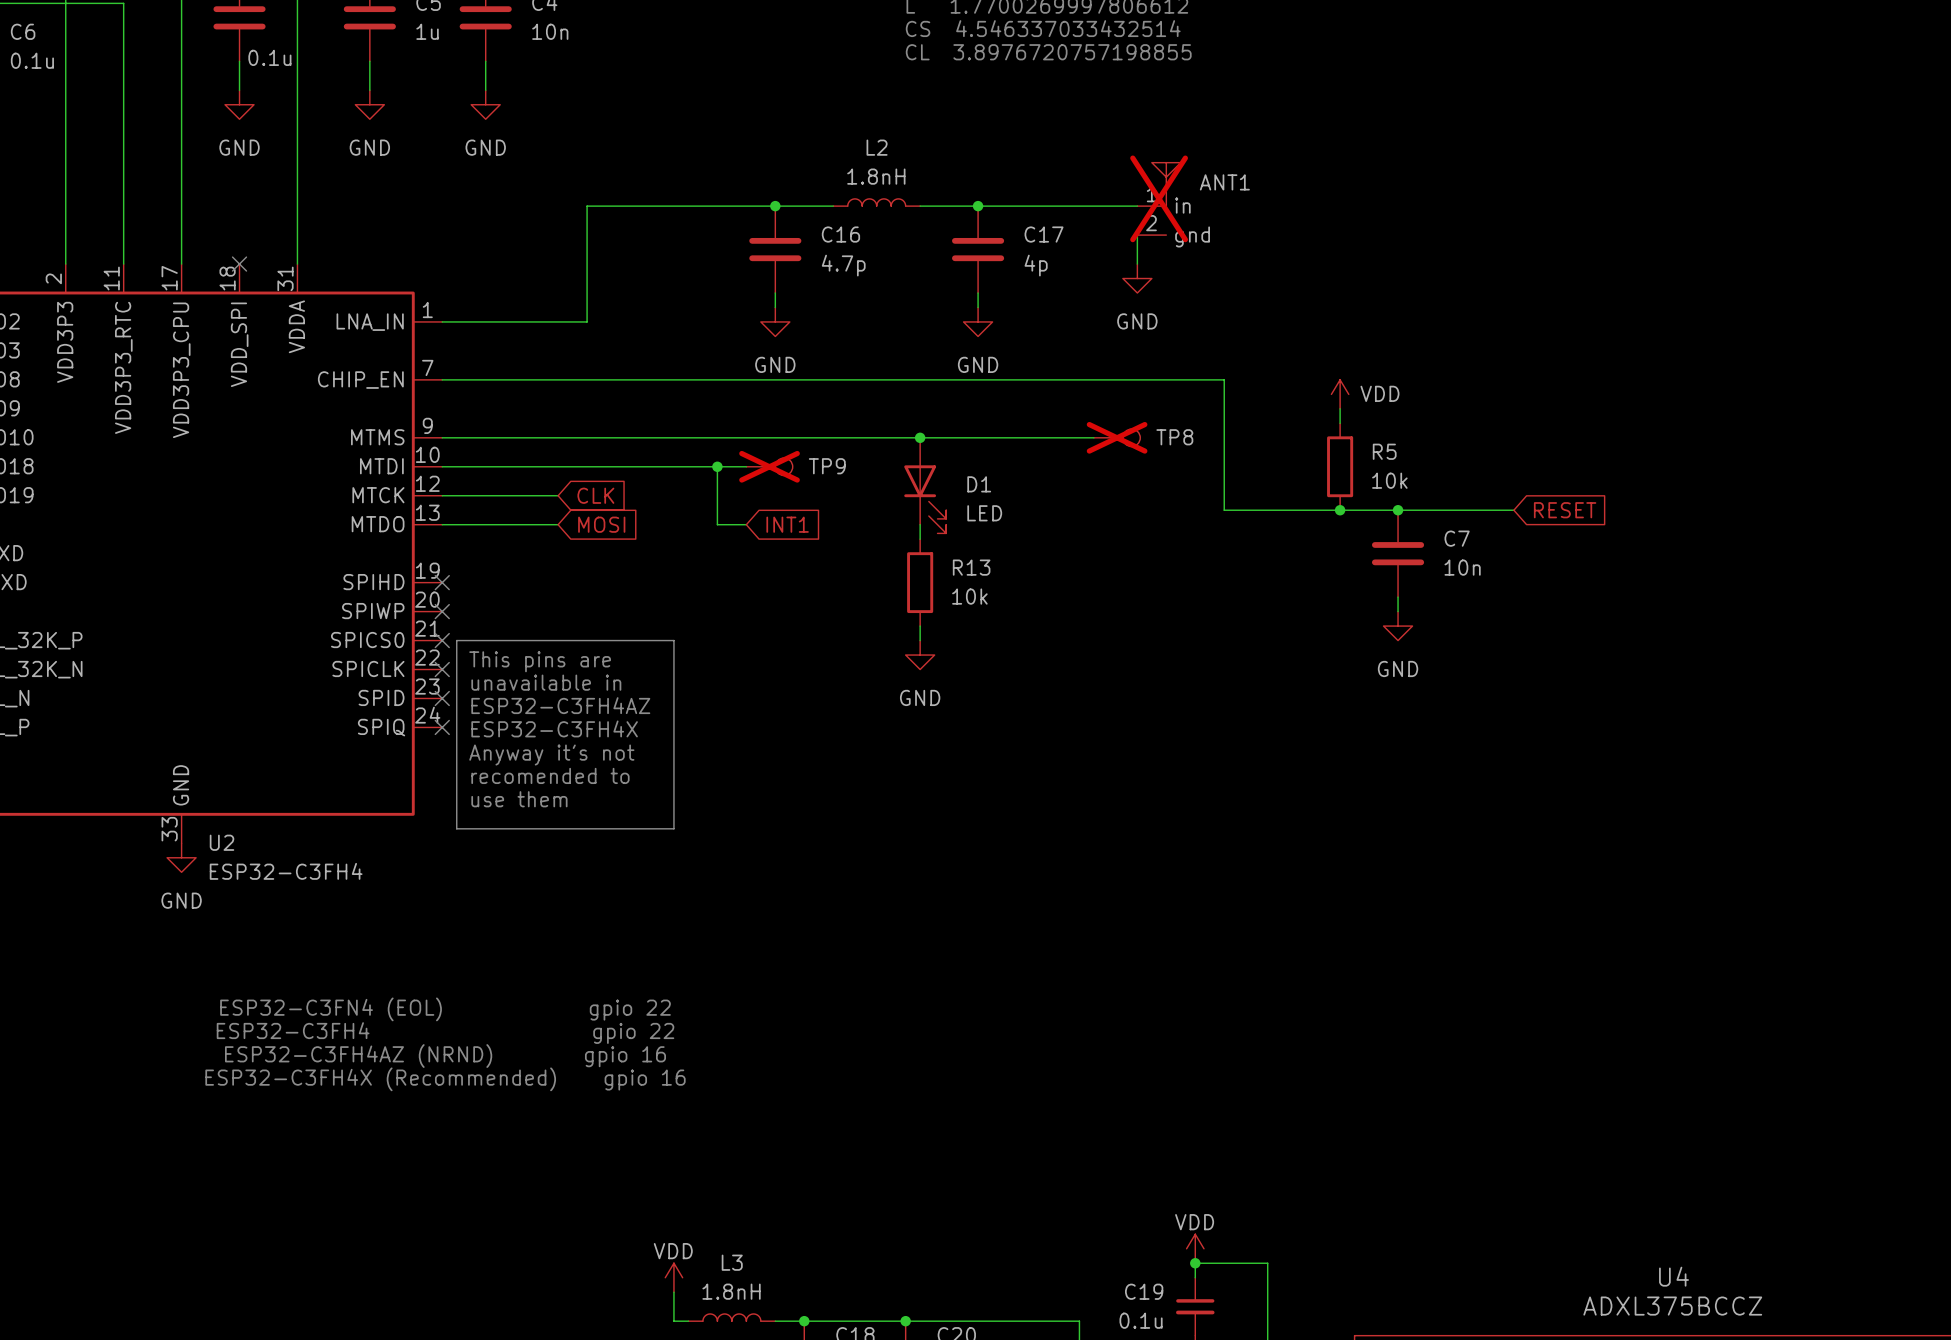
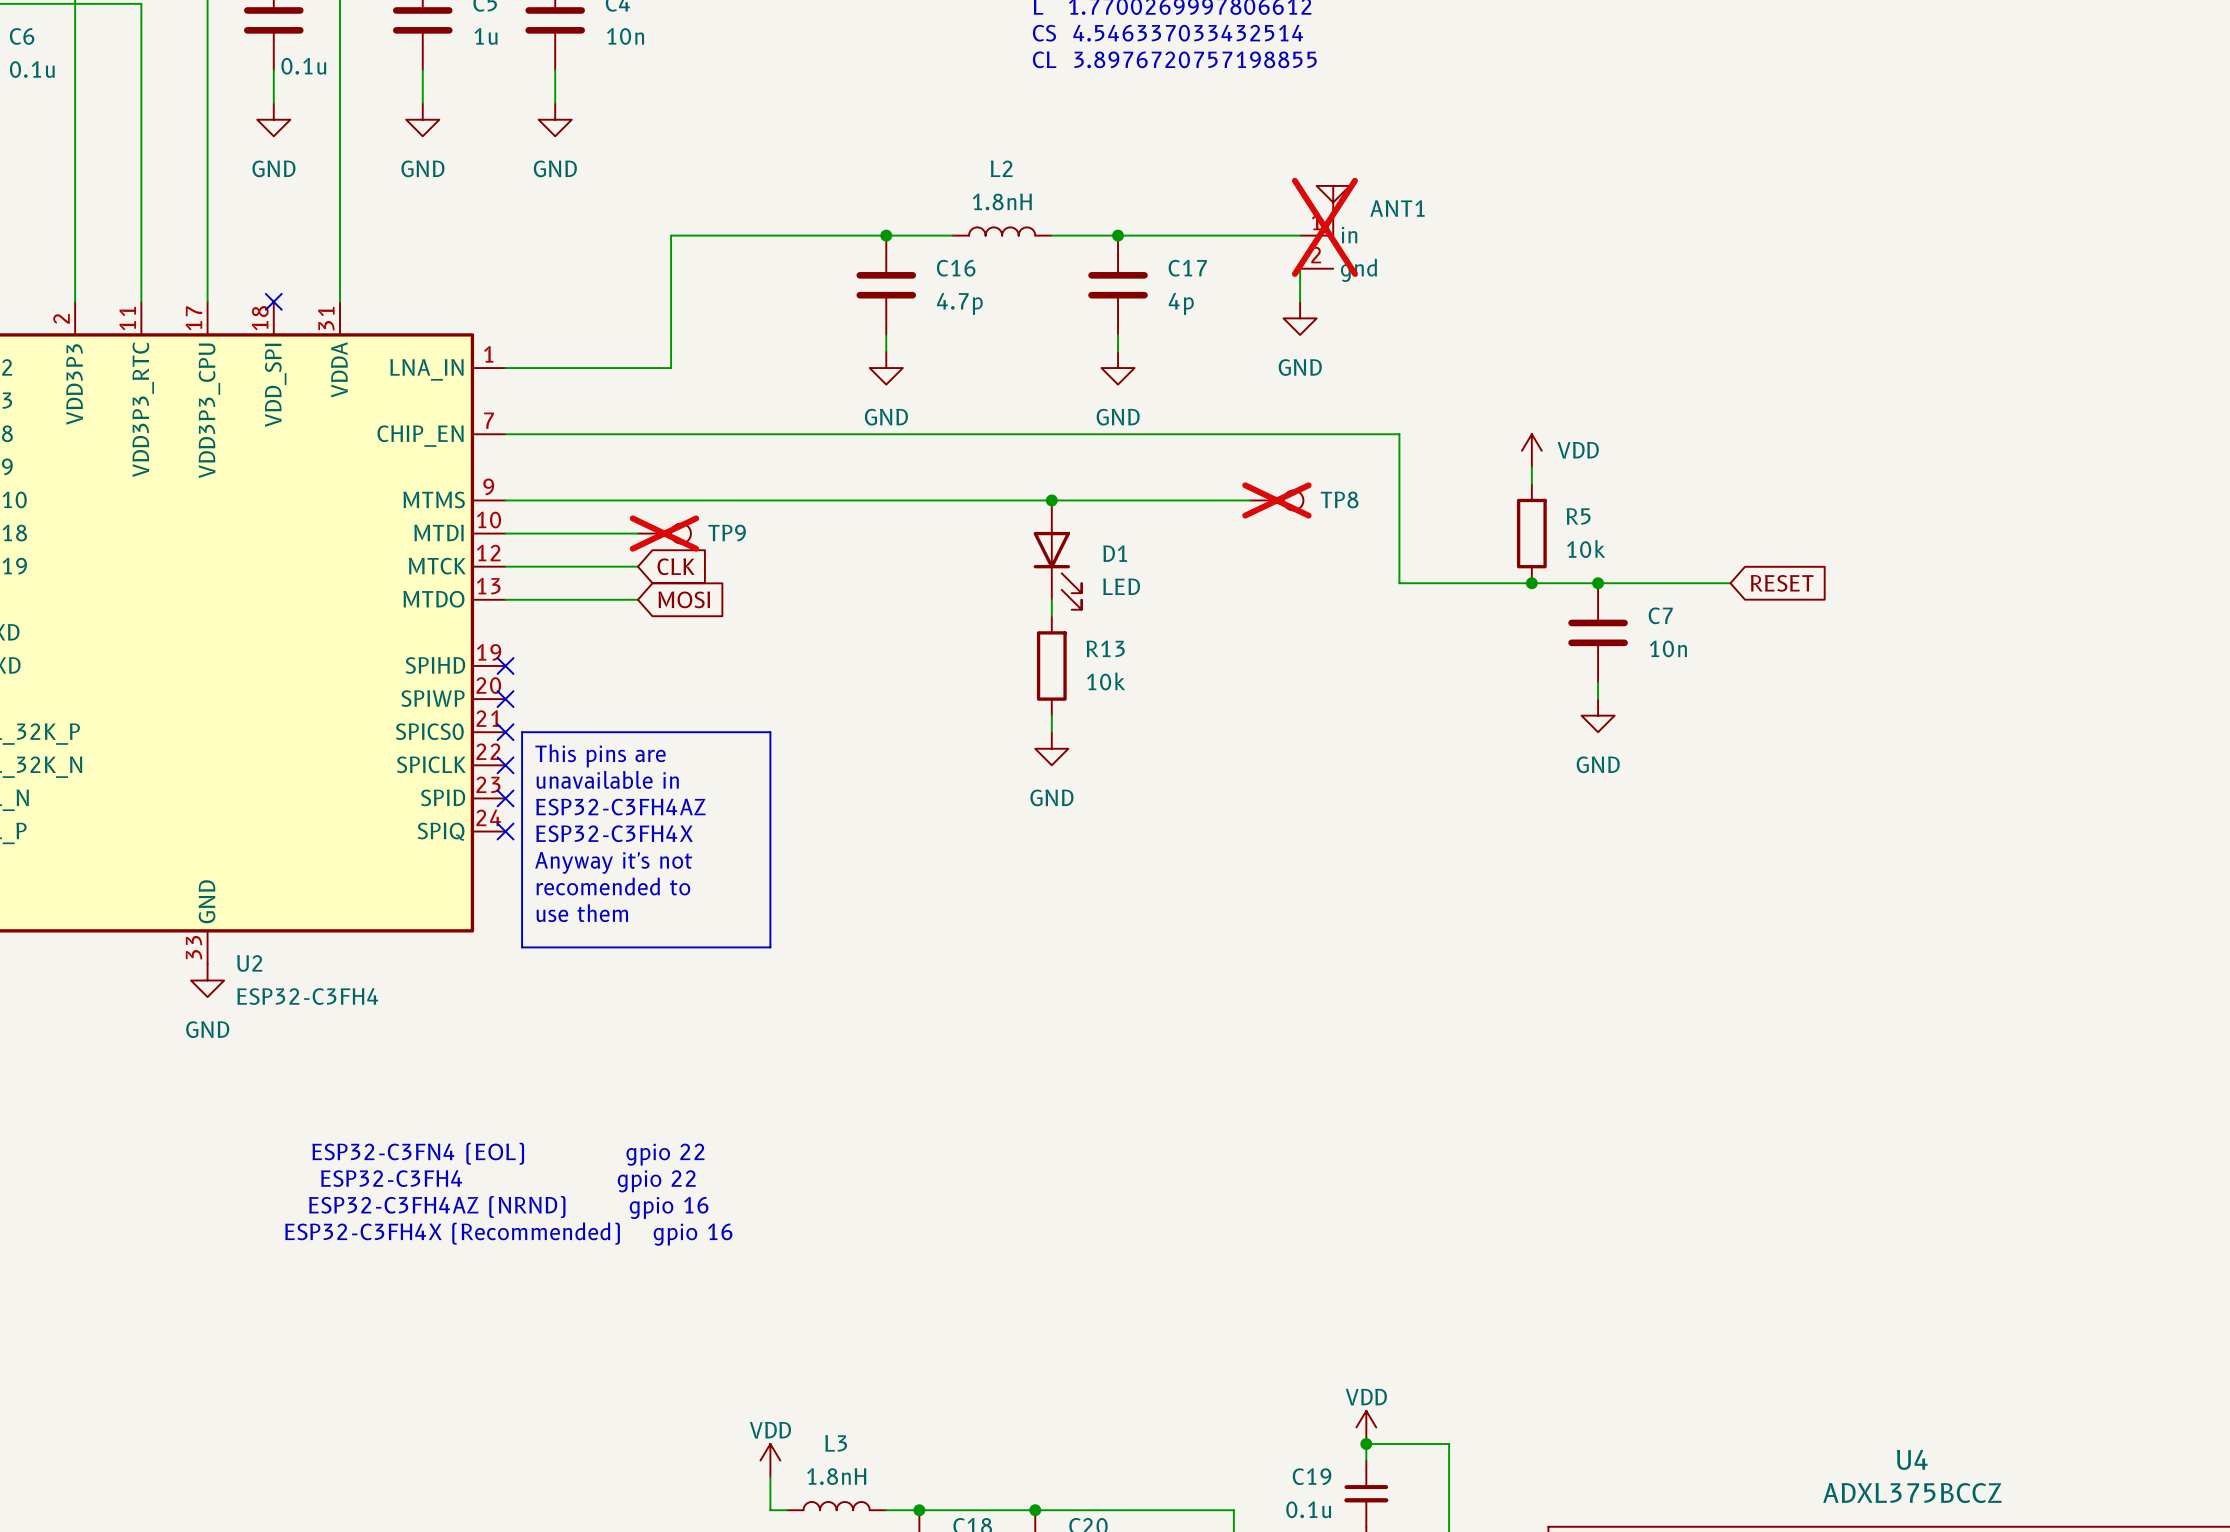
wire: (558, 466) (746, 466) -> none
wire: (717, 466) (717, 524) (746, 524) -> none
junction: (717, 466) -> none
TP9 position: (769, 466) -> (664, 533)
global label: INT1 (787, 524) -> none

